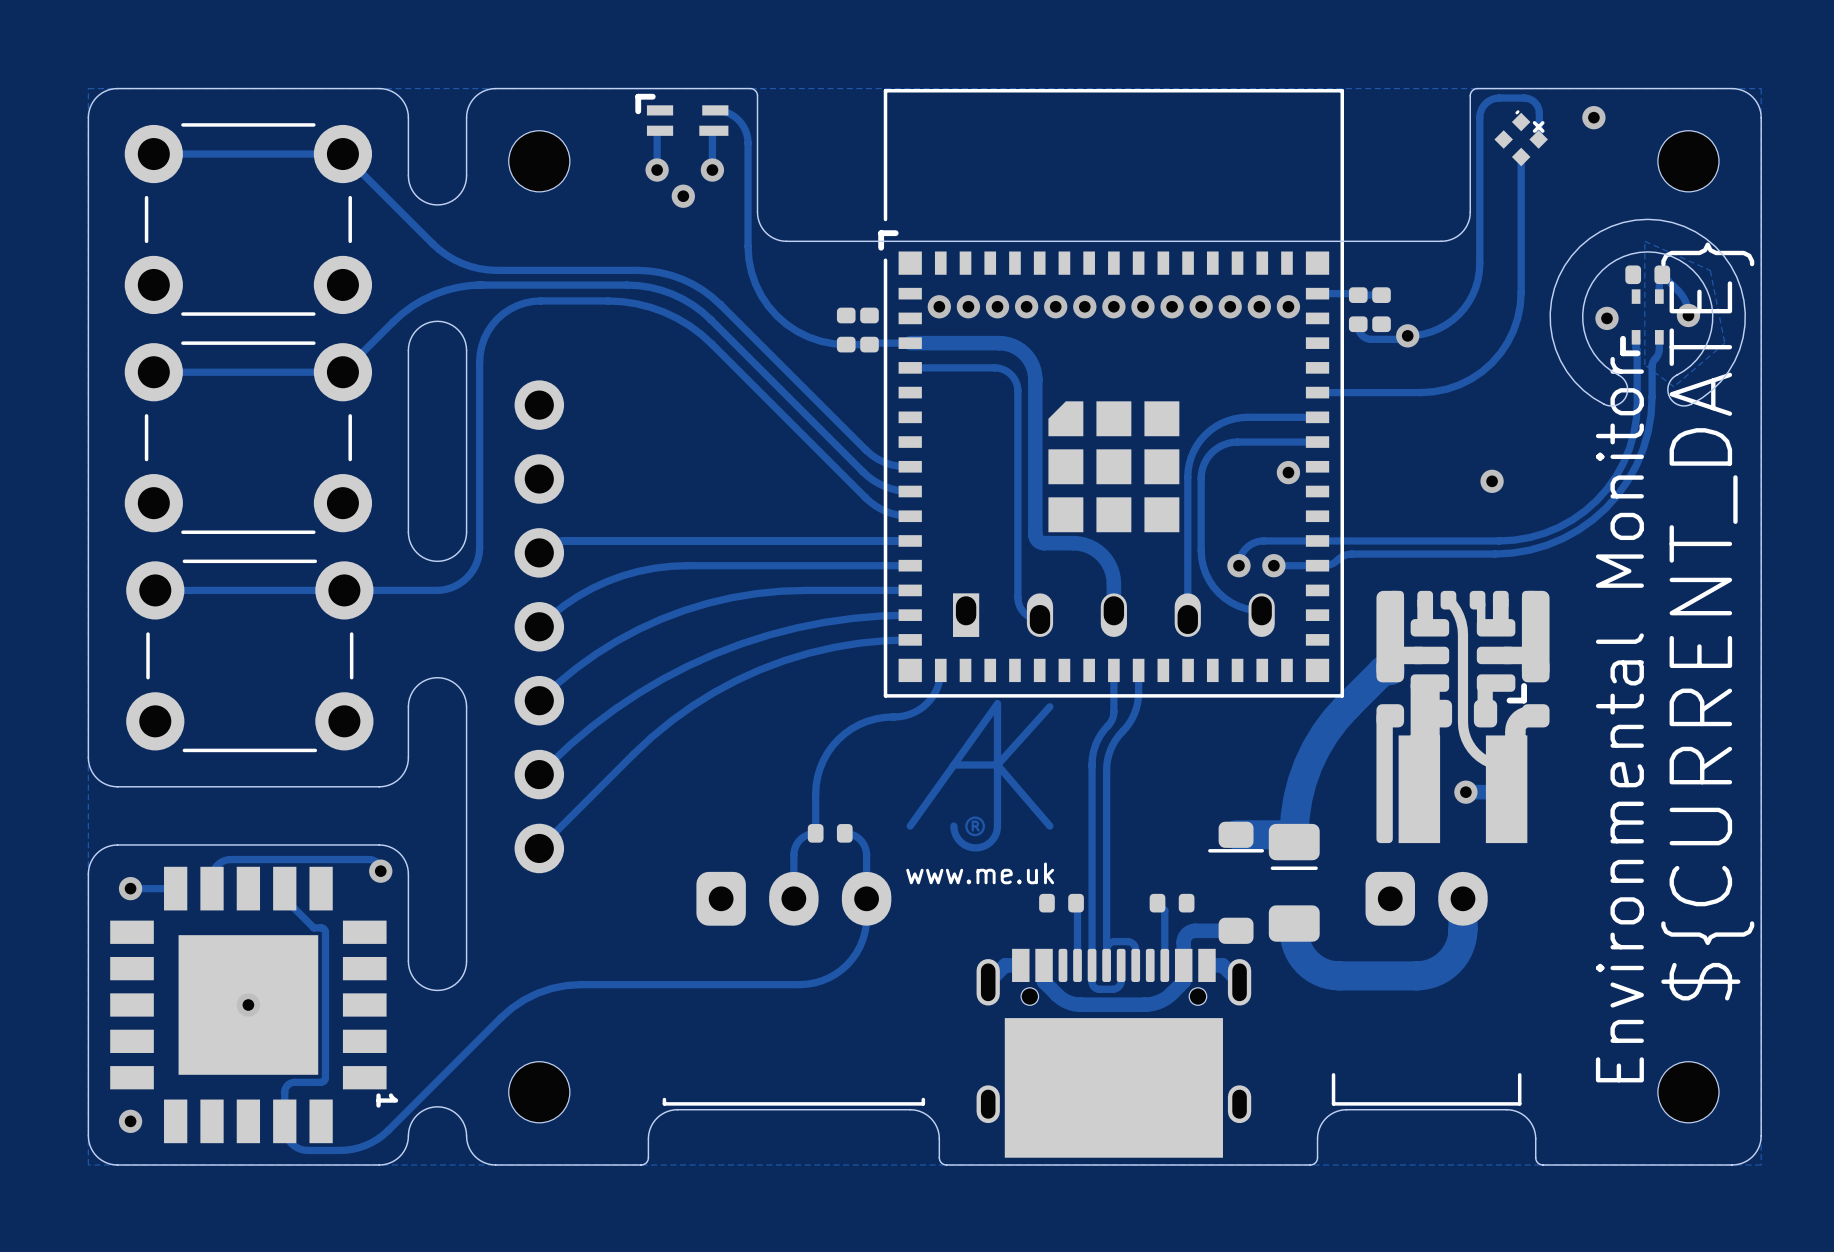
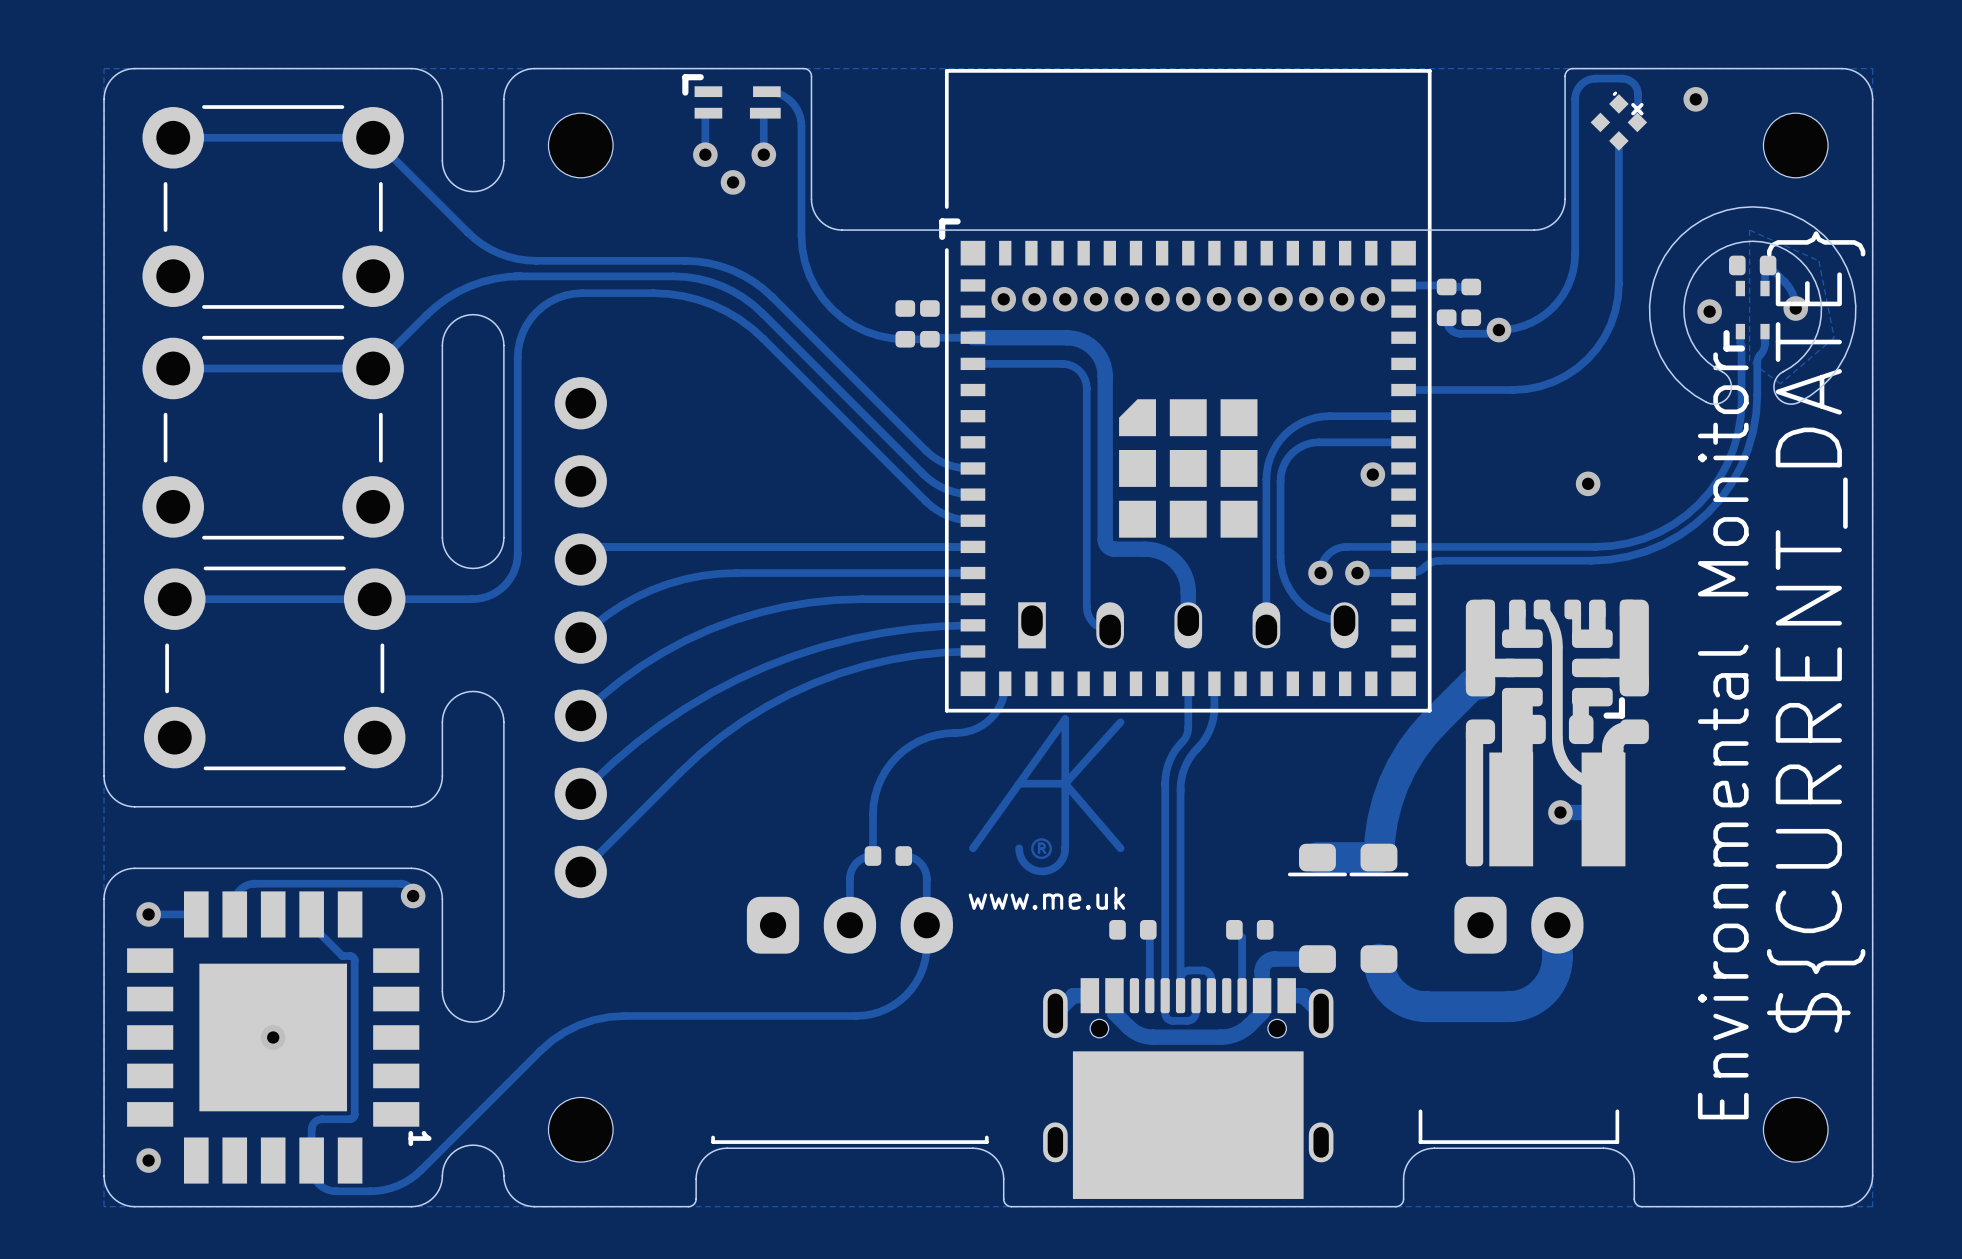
part footprint: [1268, 823, 1320, 942] -> [1349, 843, 1409, 973]

